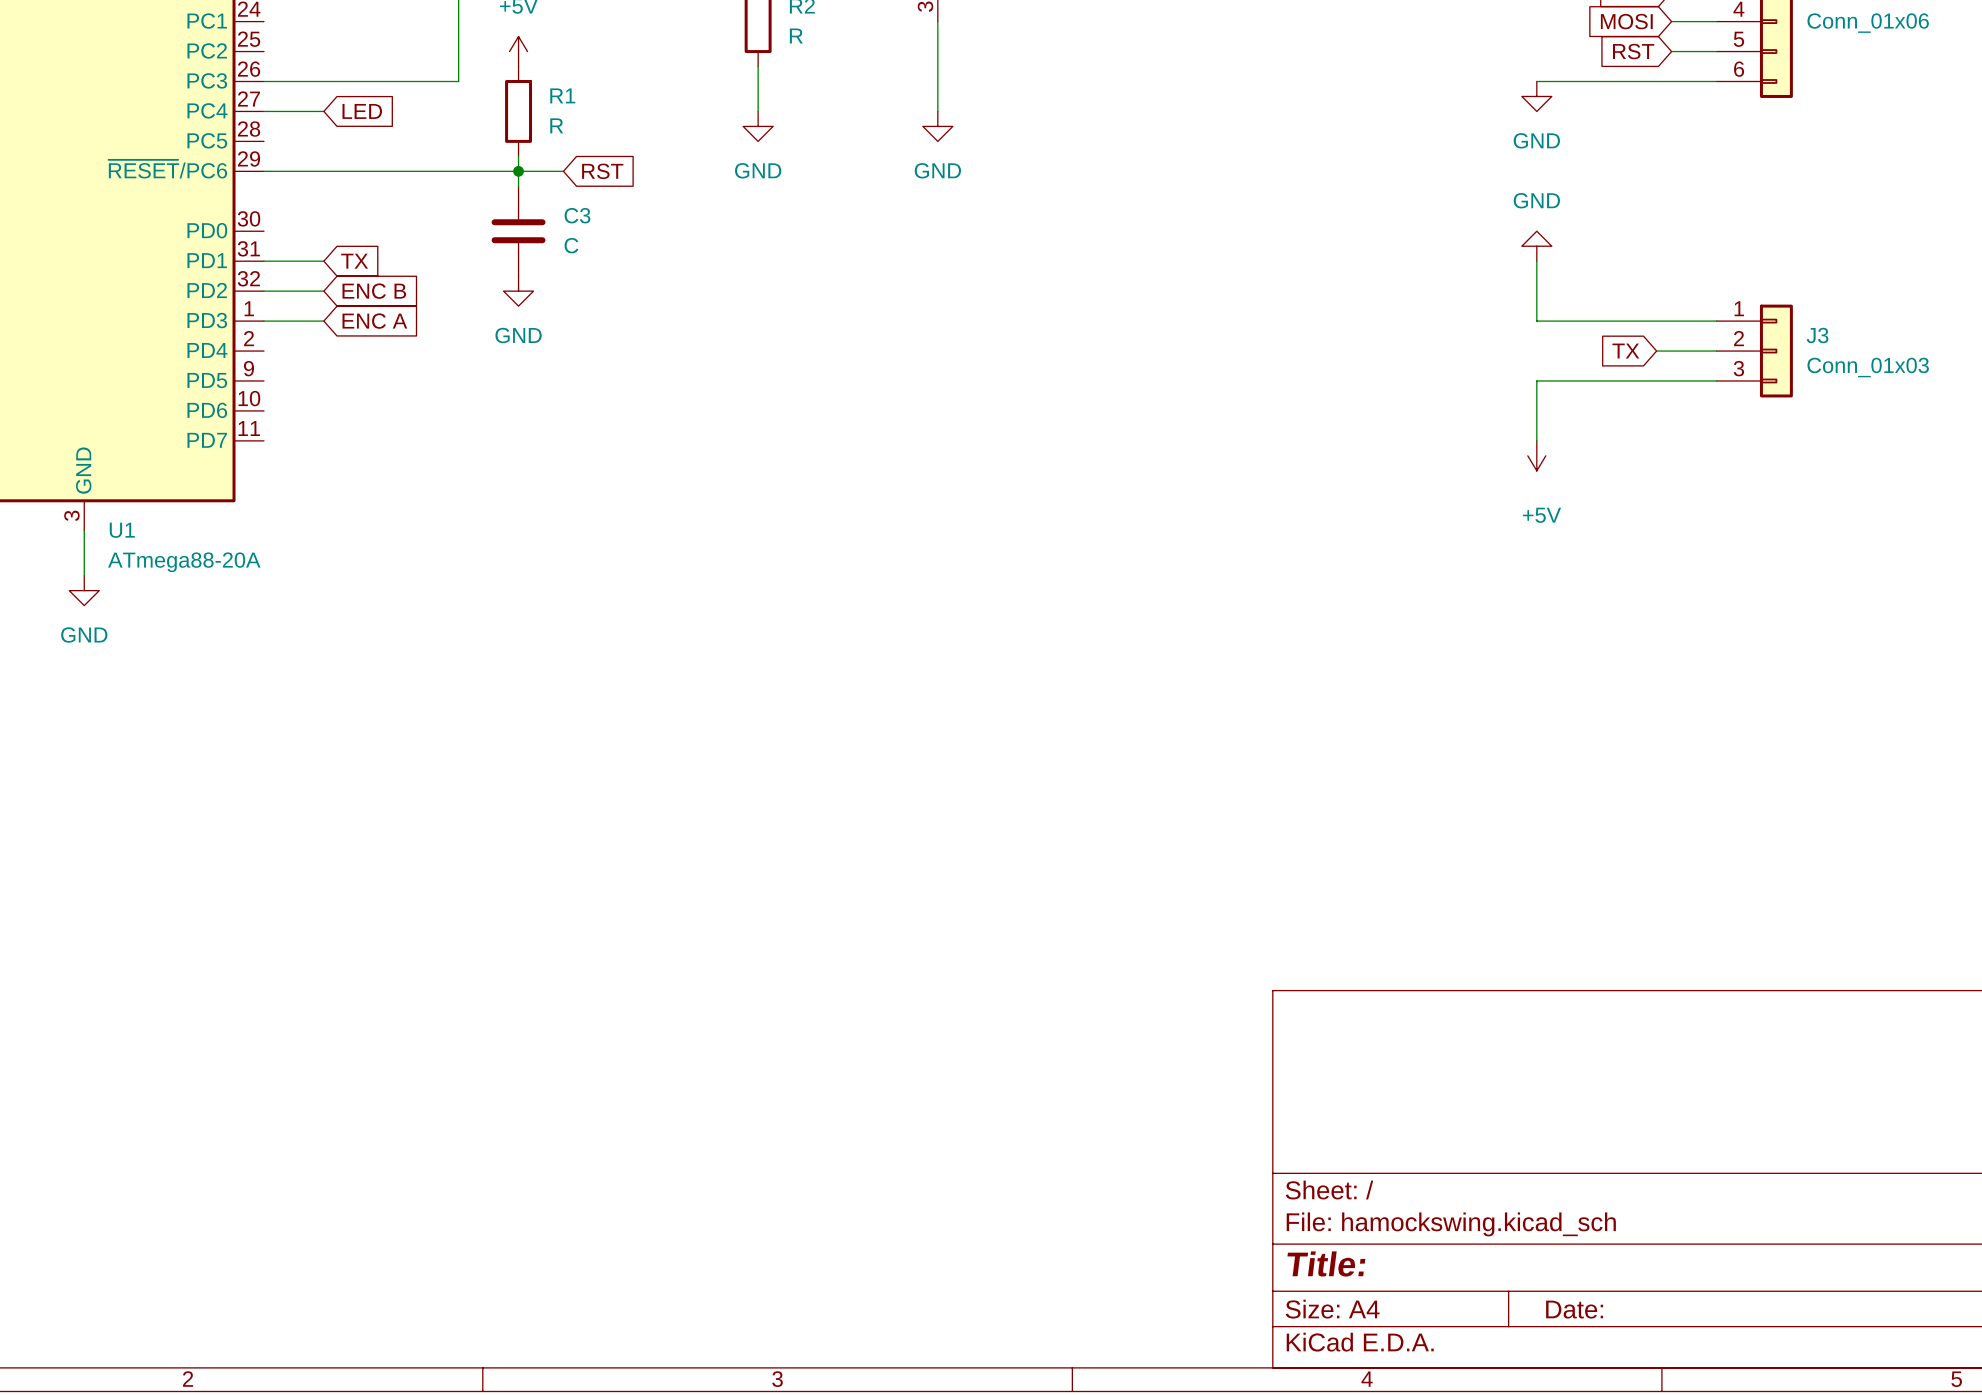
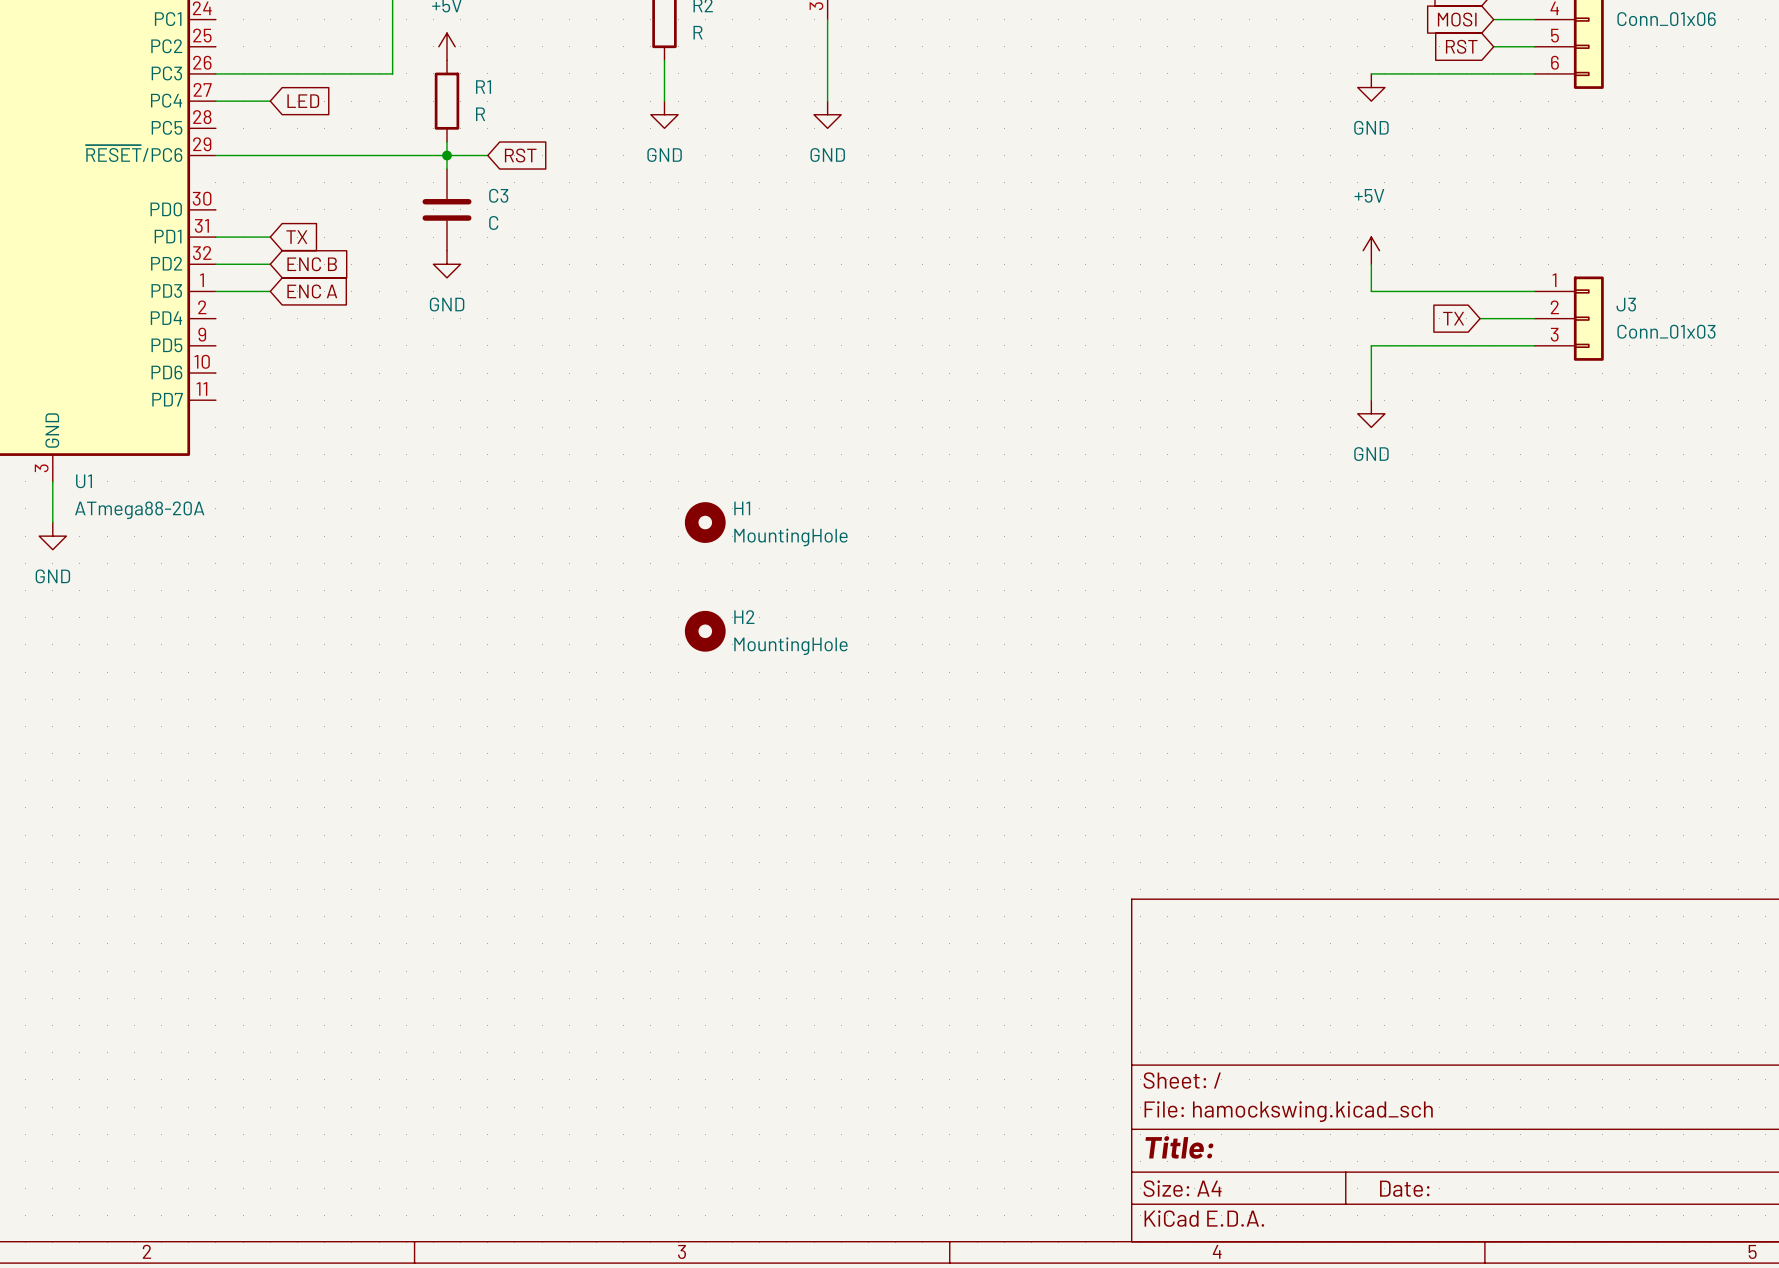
power symbol: GND (1536, 246) -> none
power symbol: none -> +5V (1371, 250)
power symbol: +5V (1536, 455) -> GND (1371, 413)
H1: none -> MountingHole (705, 522)
H2: none -> MountingHole (705, 631)

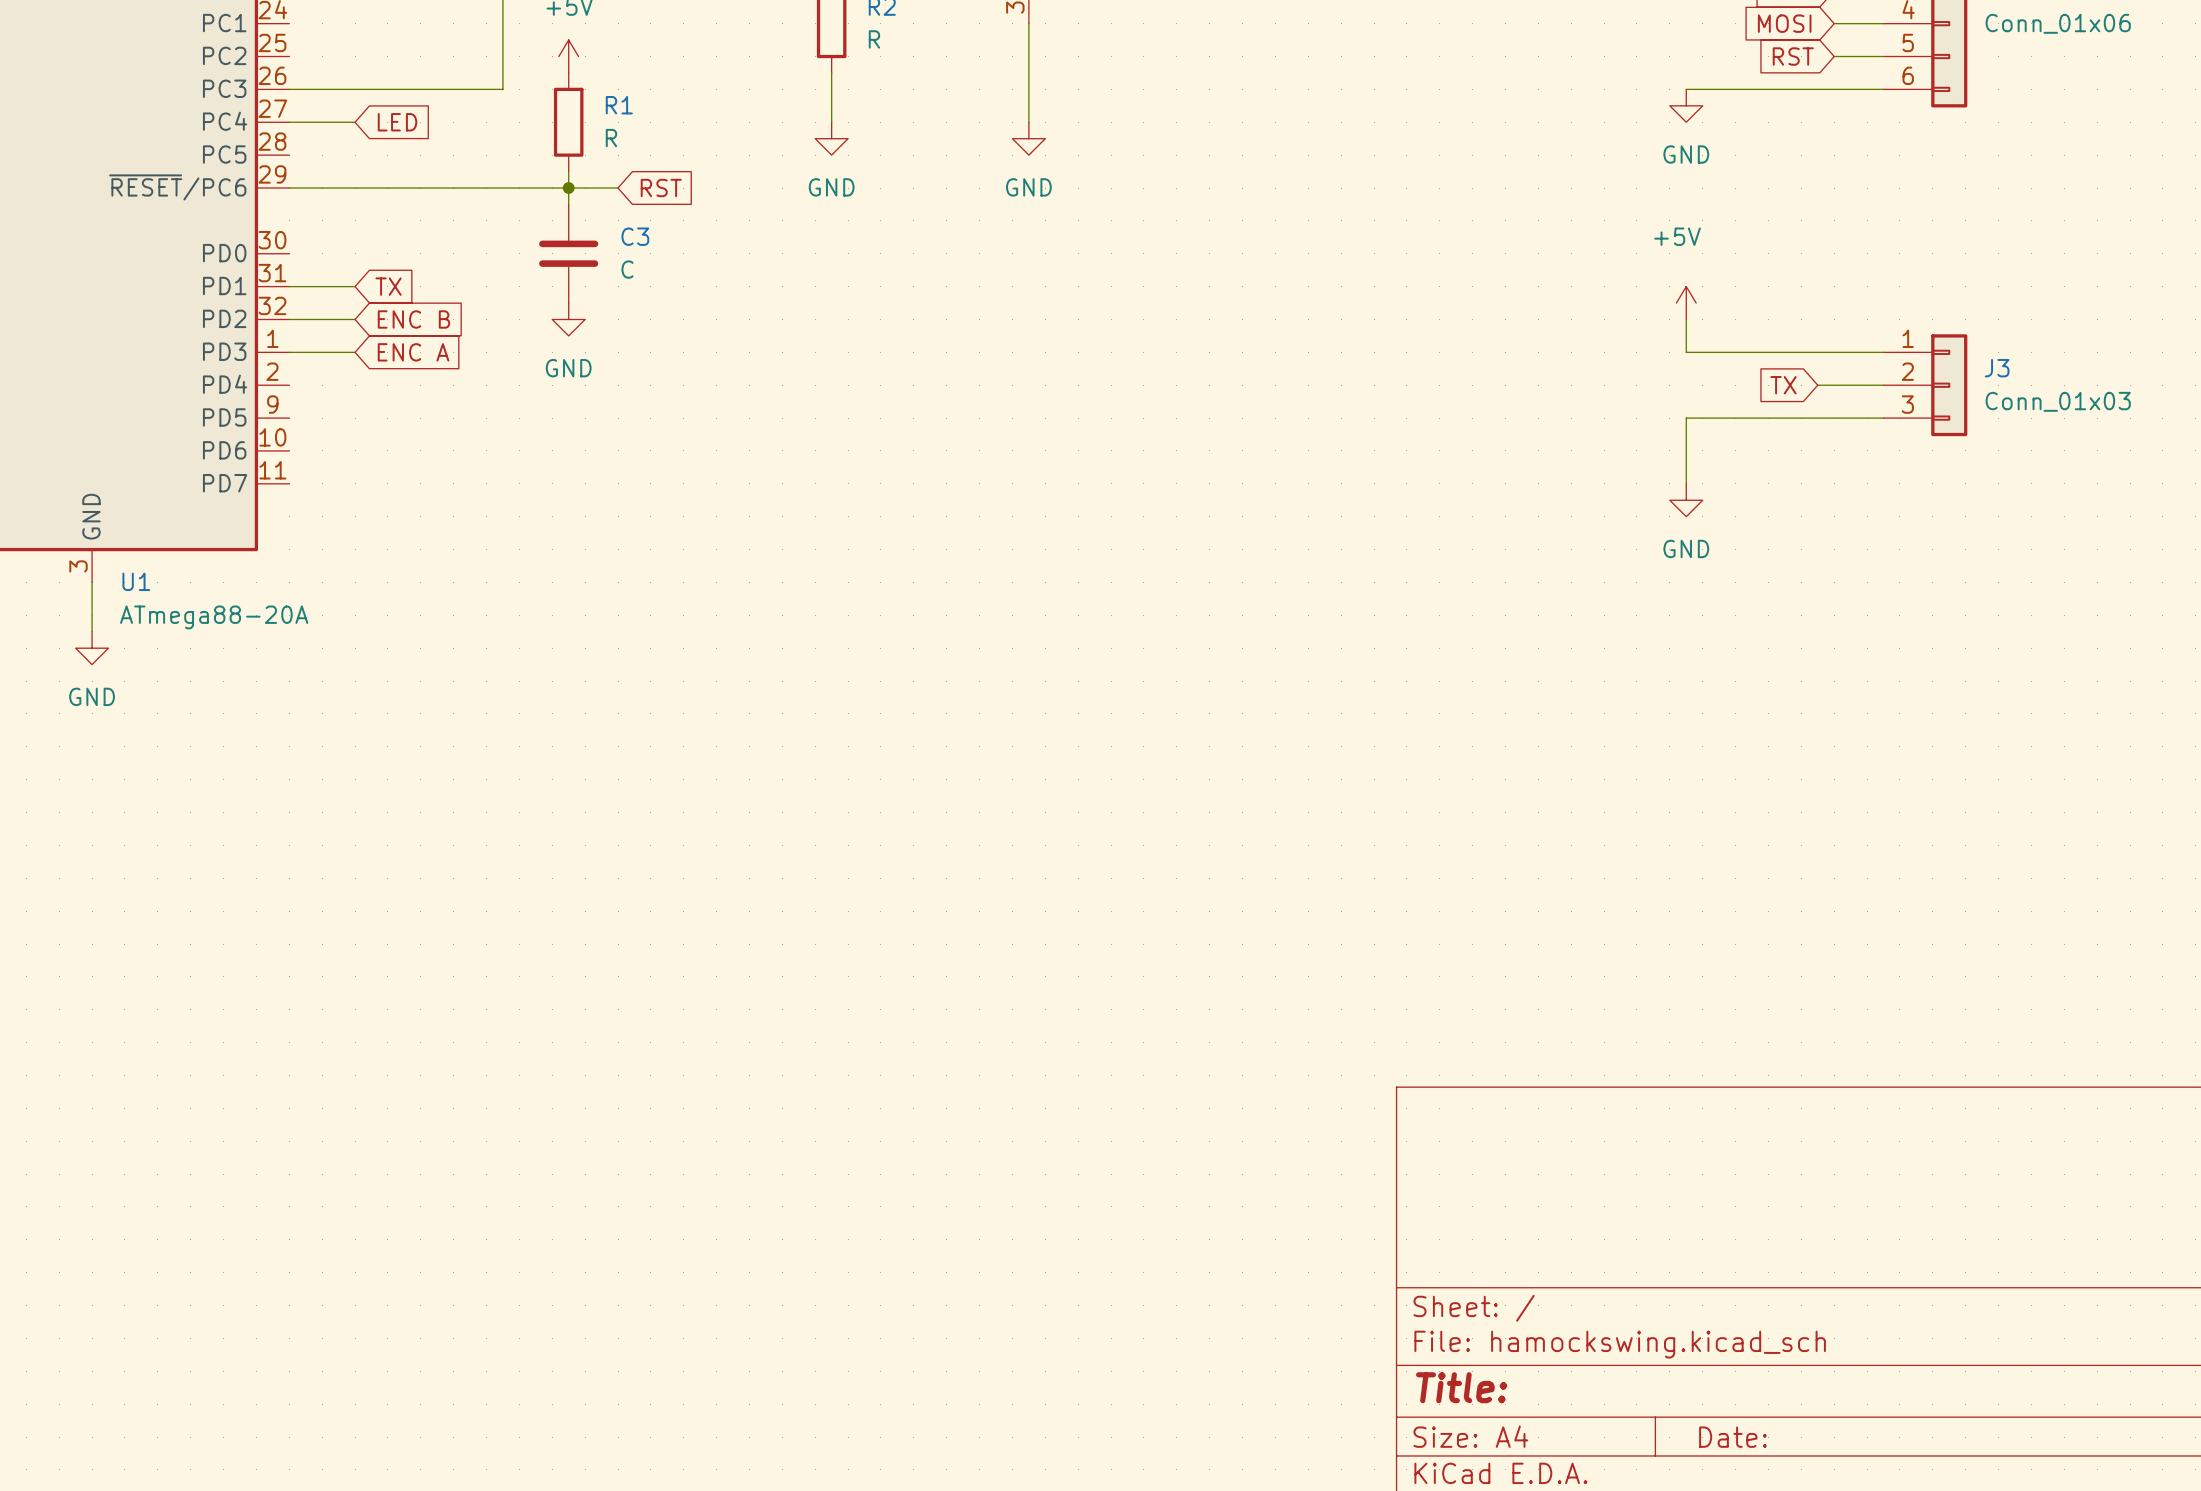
H1: MountingHole (705, 522) -> none
H2: MountingHole (705, 631) -> none

